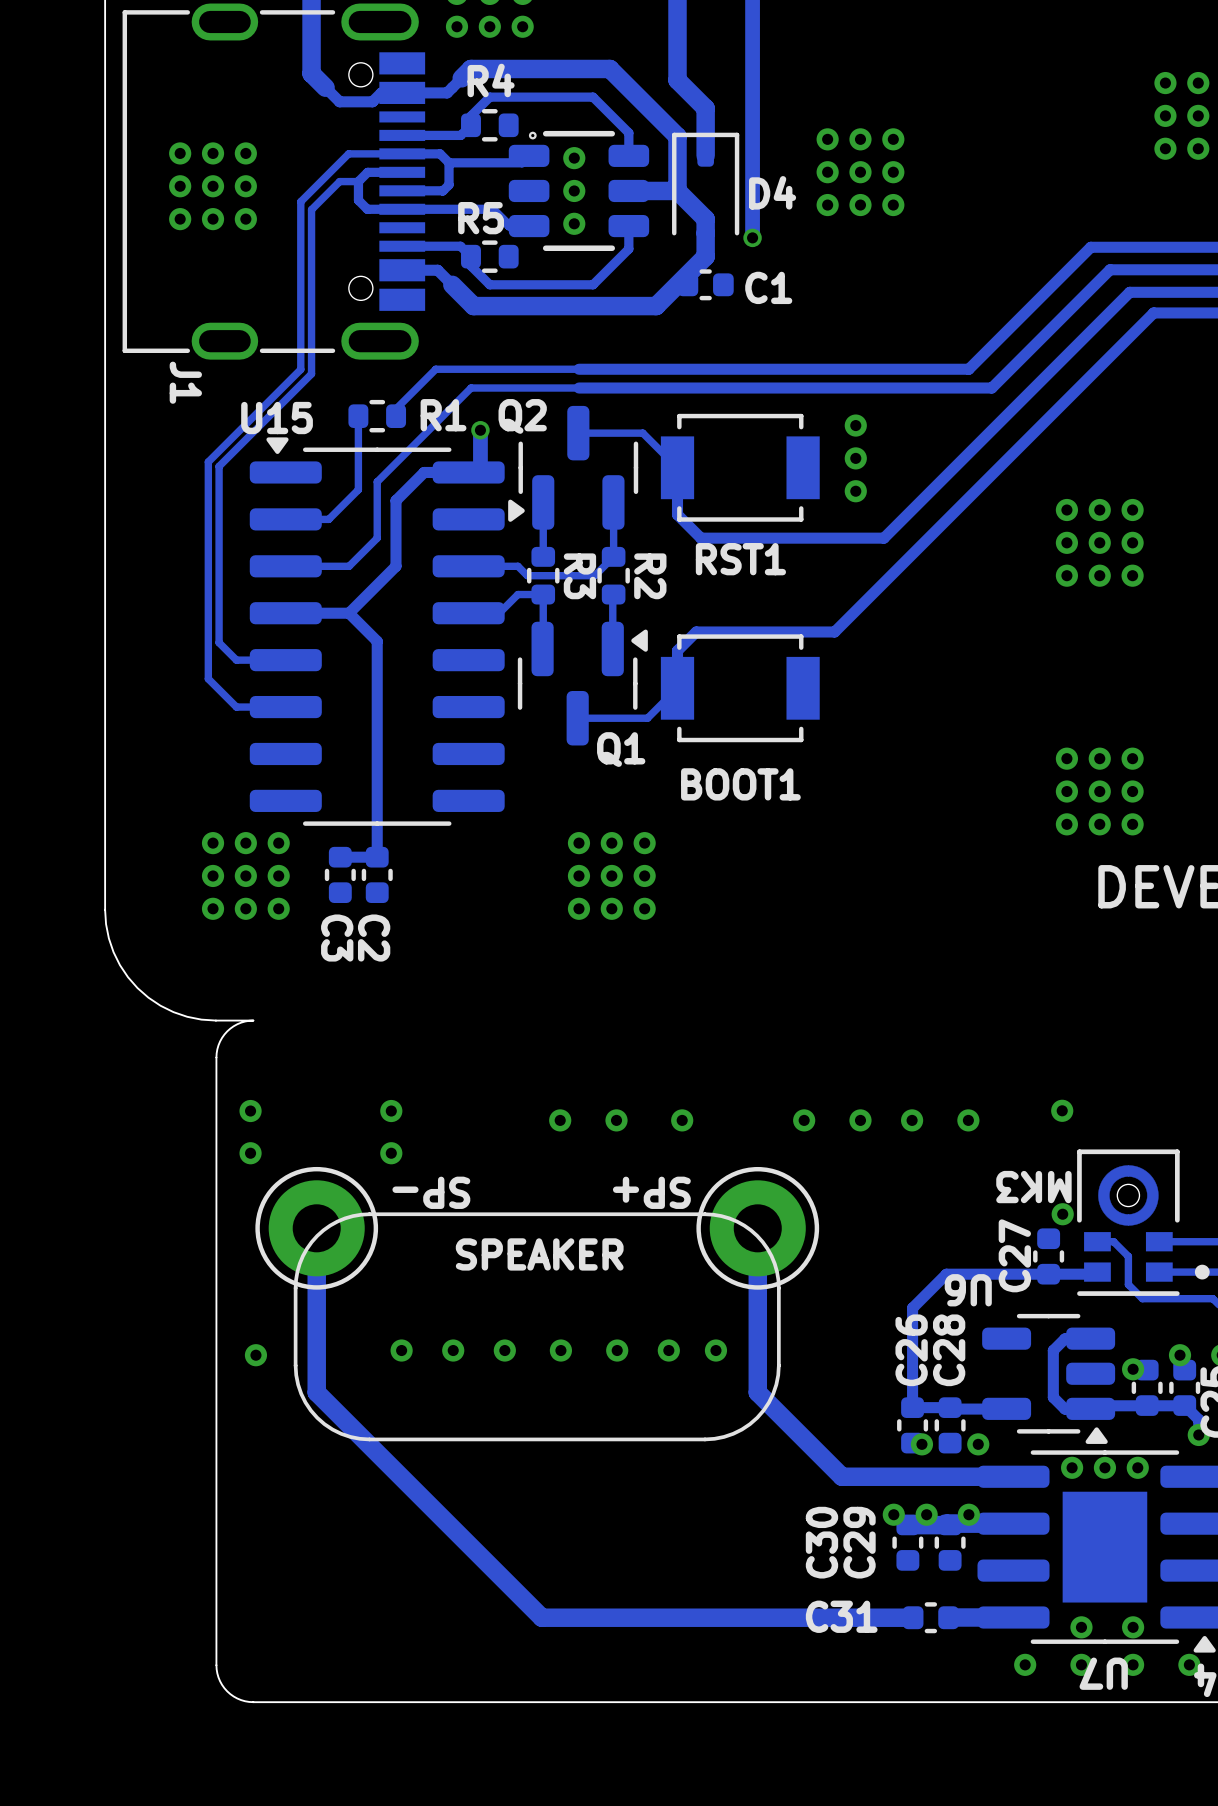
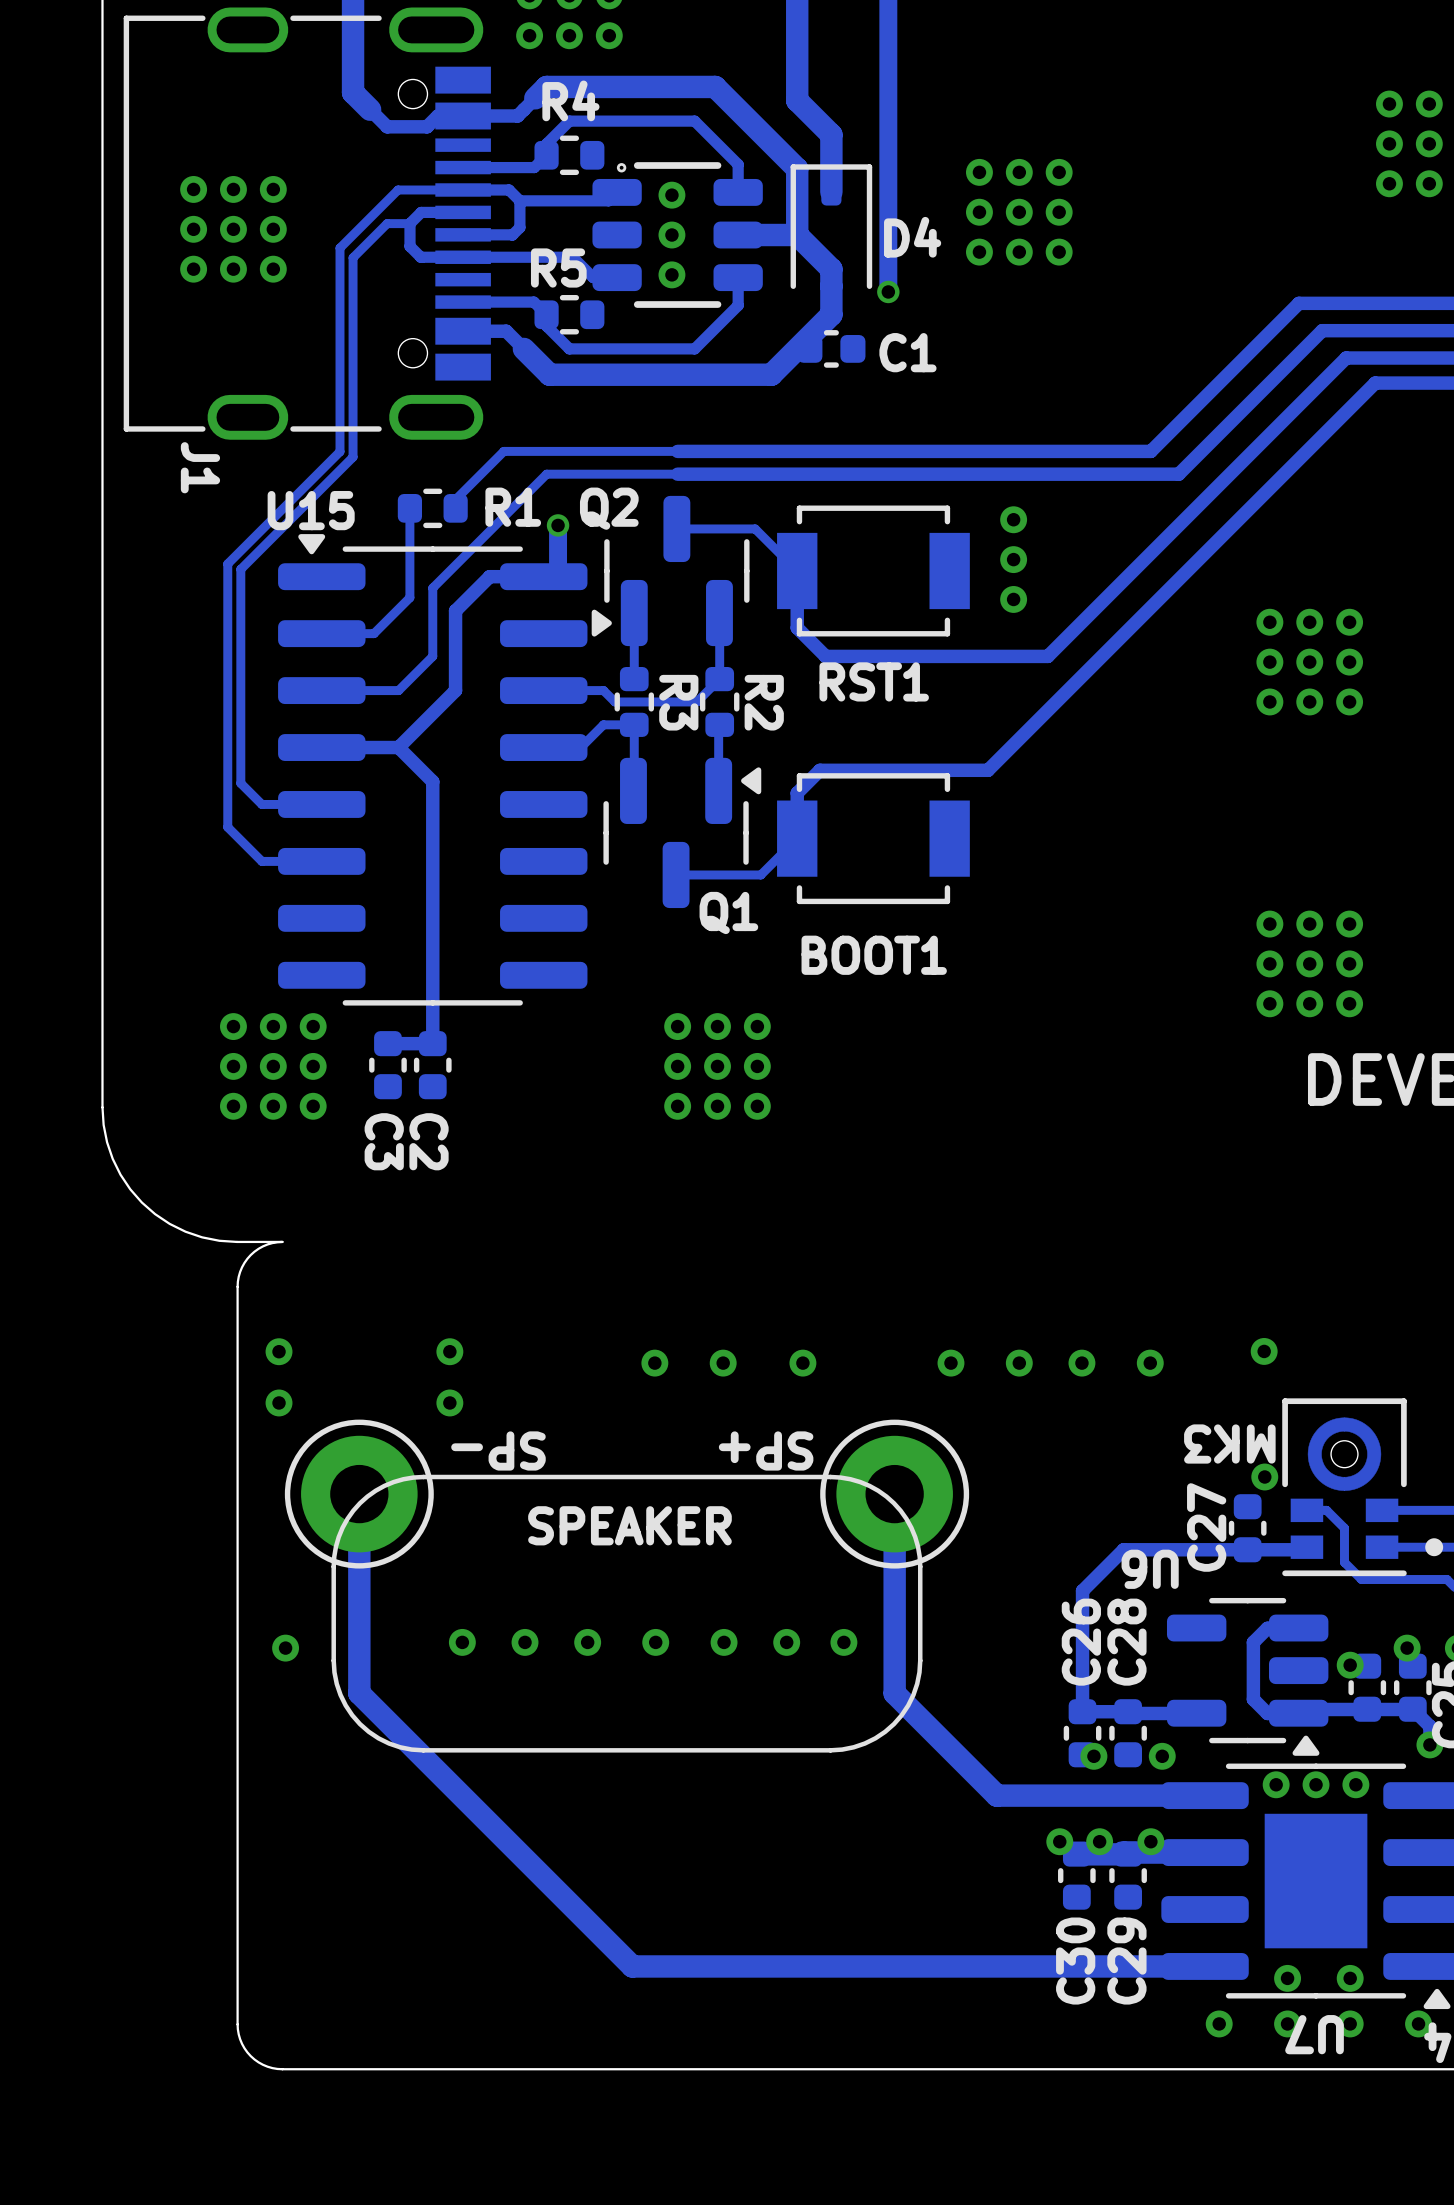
C30 name position: C30 (821, 1542) -> C30 (1075, 1961)
C29 name position: C29 (859, 1542) -> C29 (1126, 1961)
track: (913, 1617) (541, 1617) -> (1126, 1966) (632, 1966)
C31: (930, 1617) -> none

